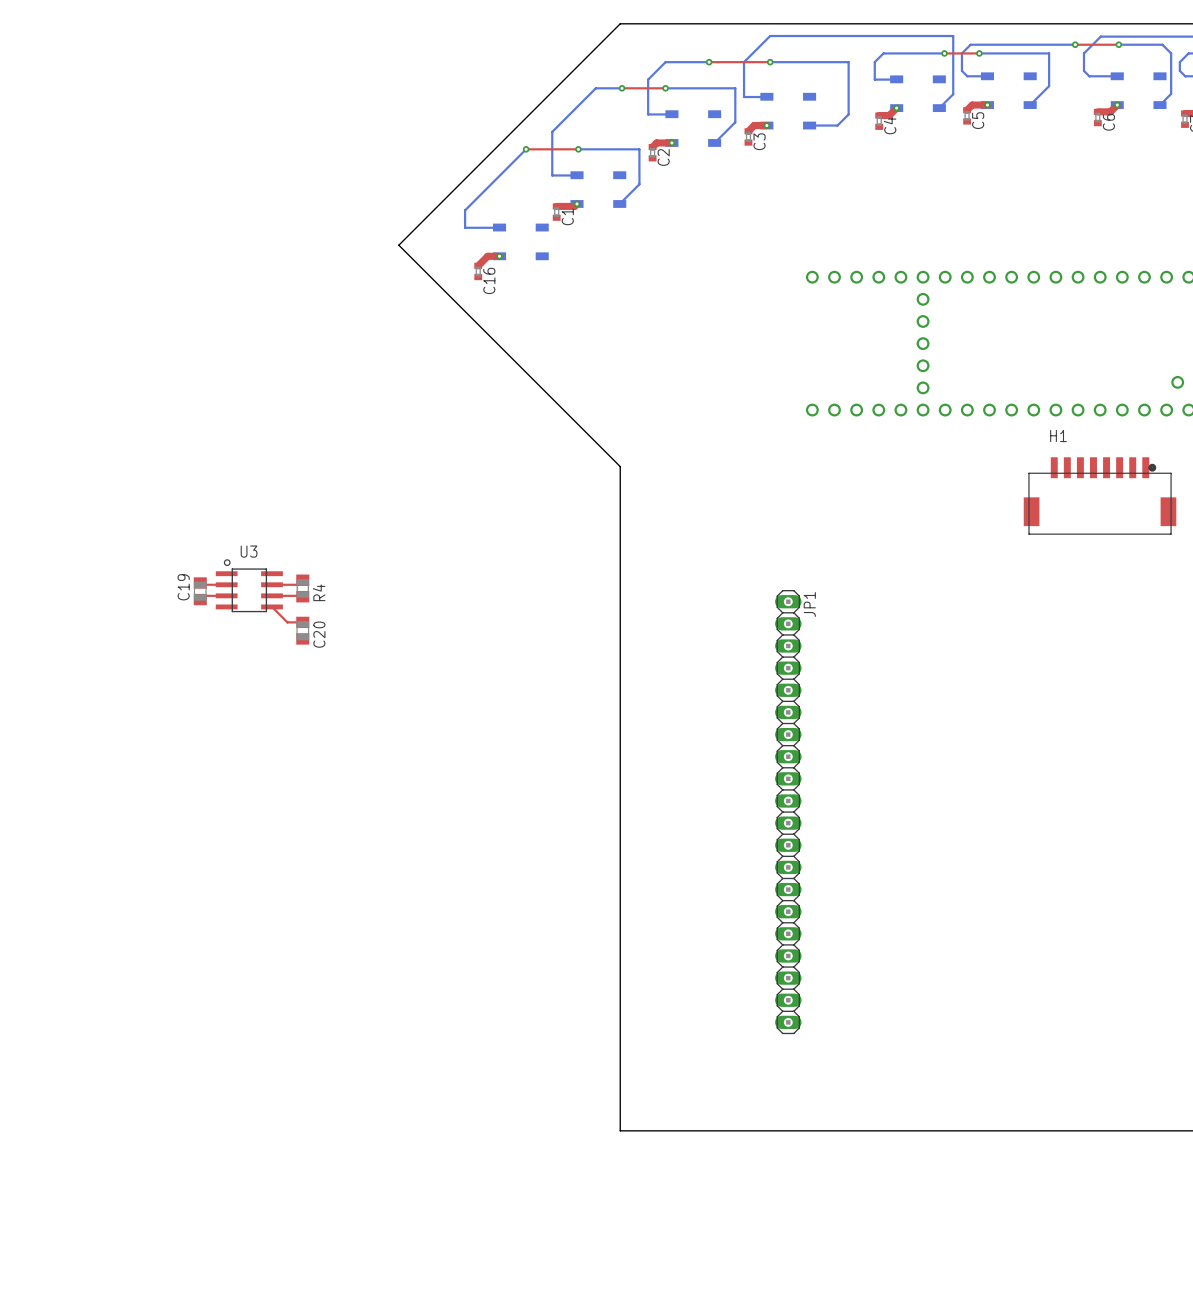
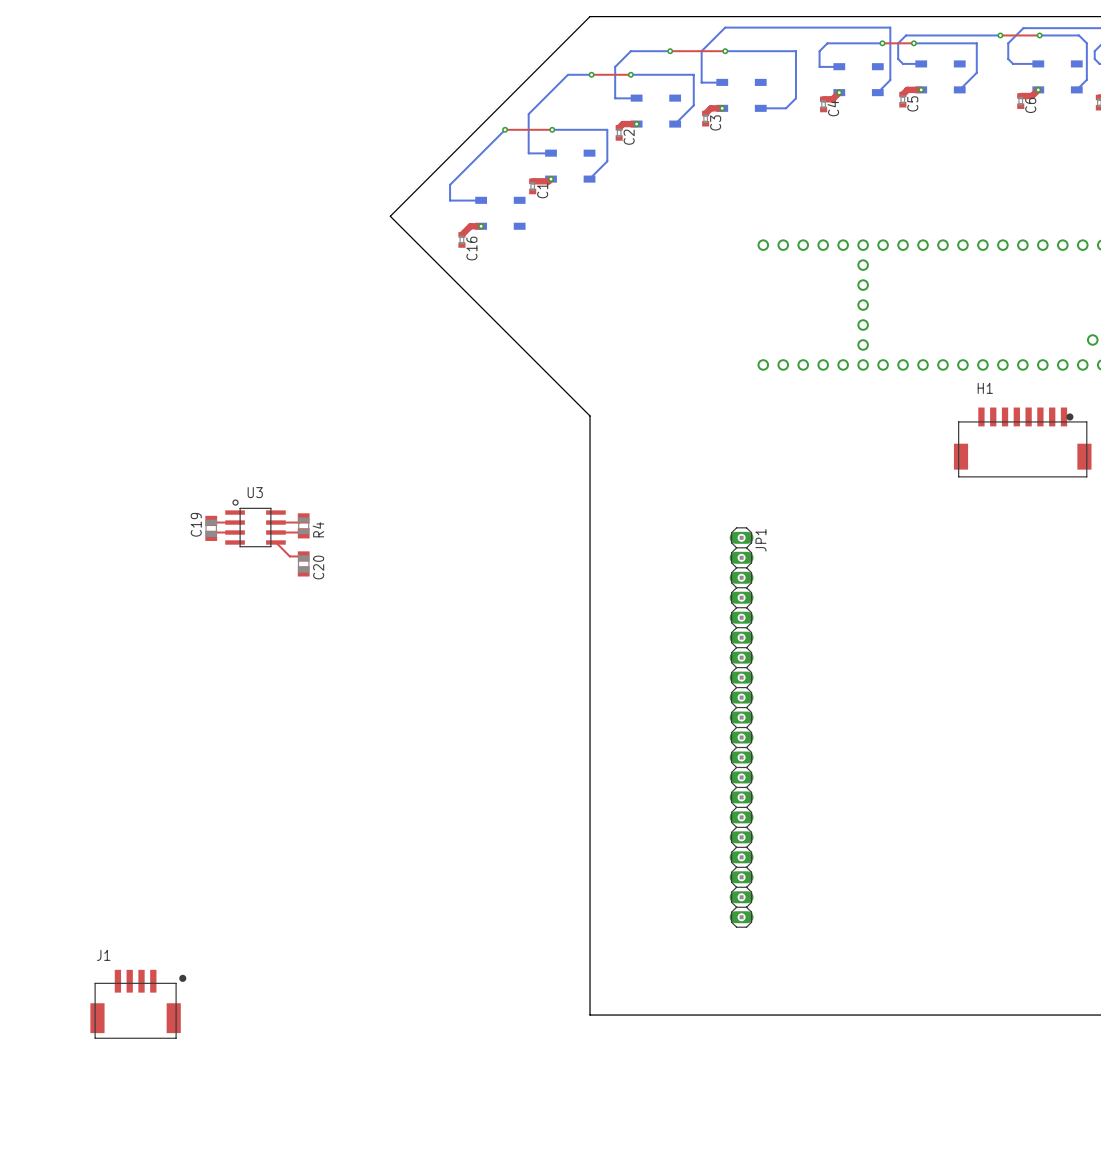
J1: none -> (138, 1004)

